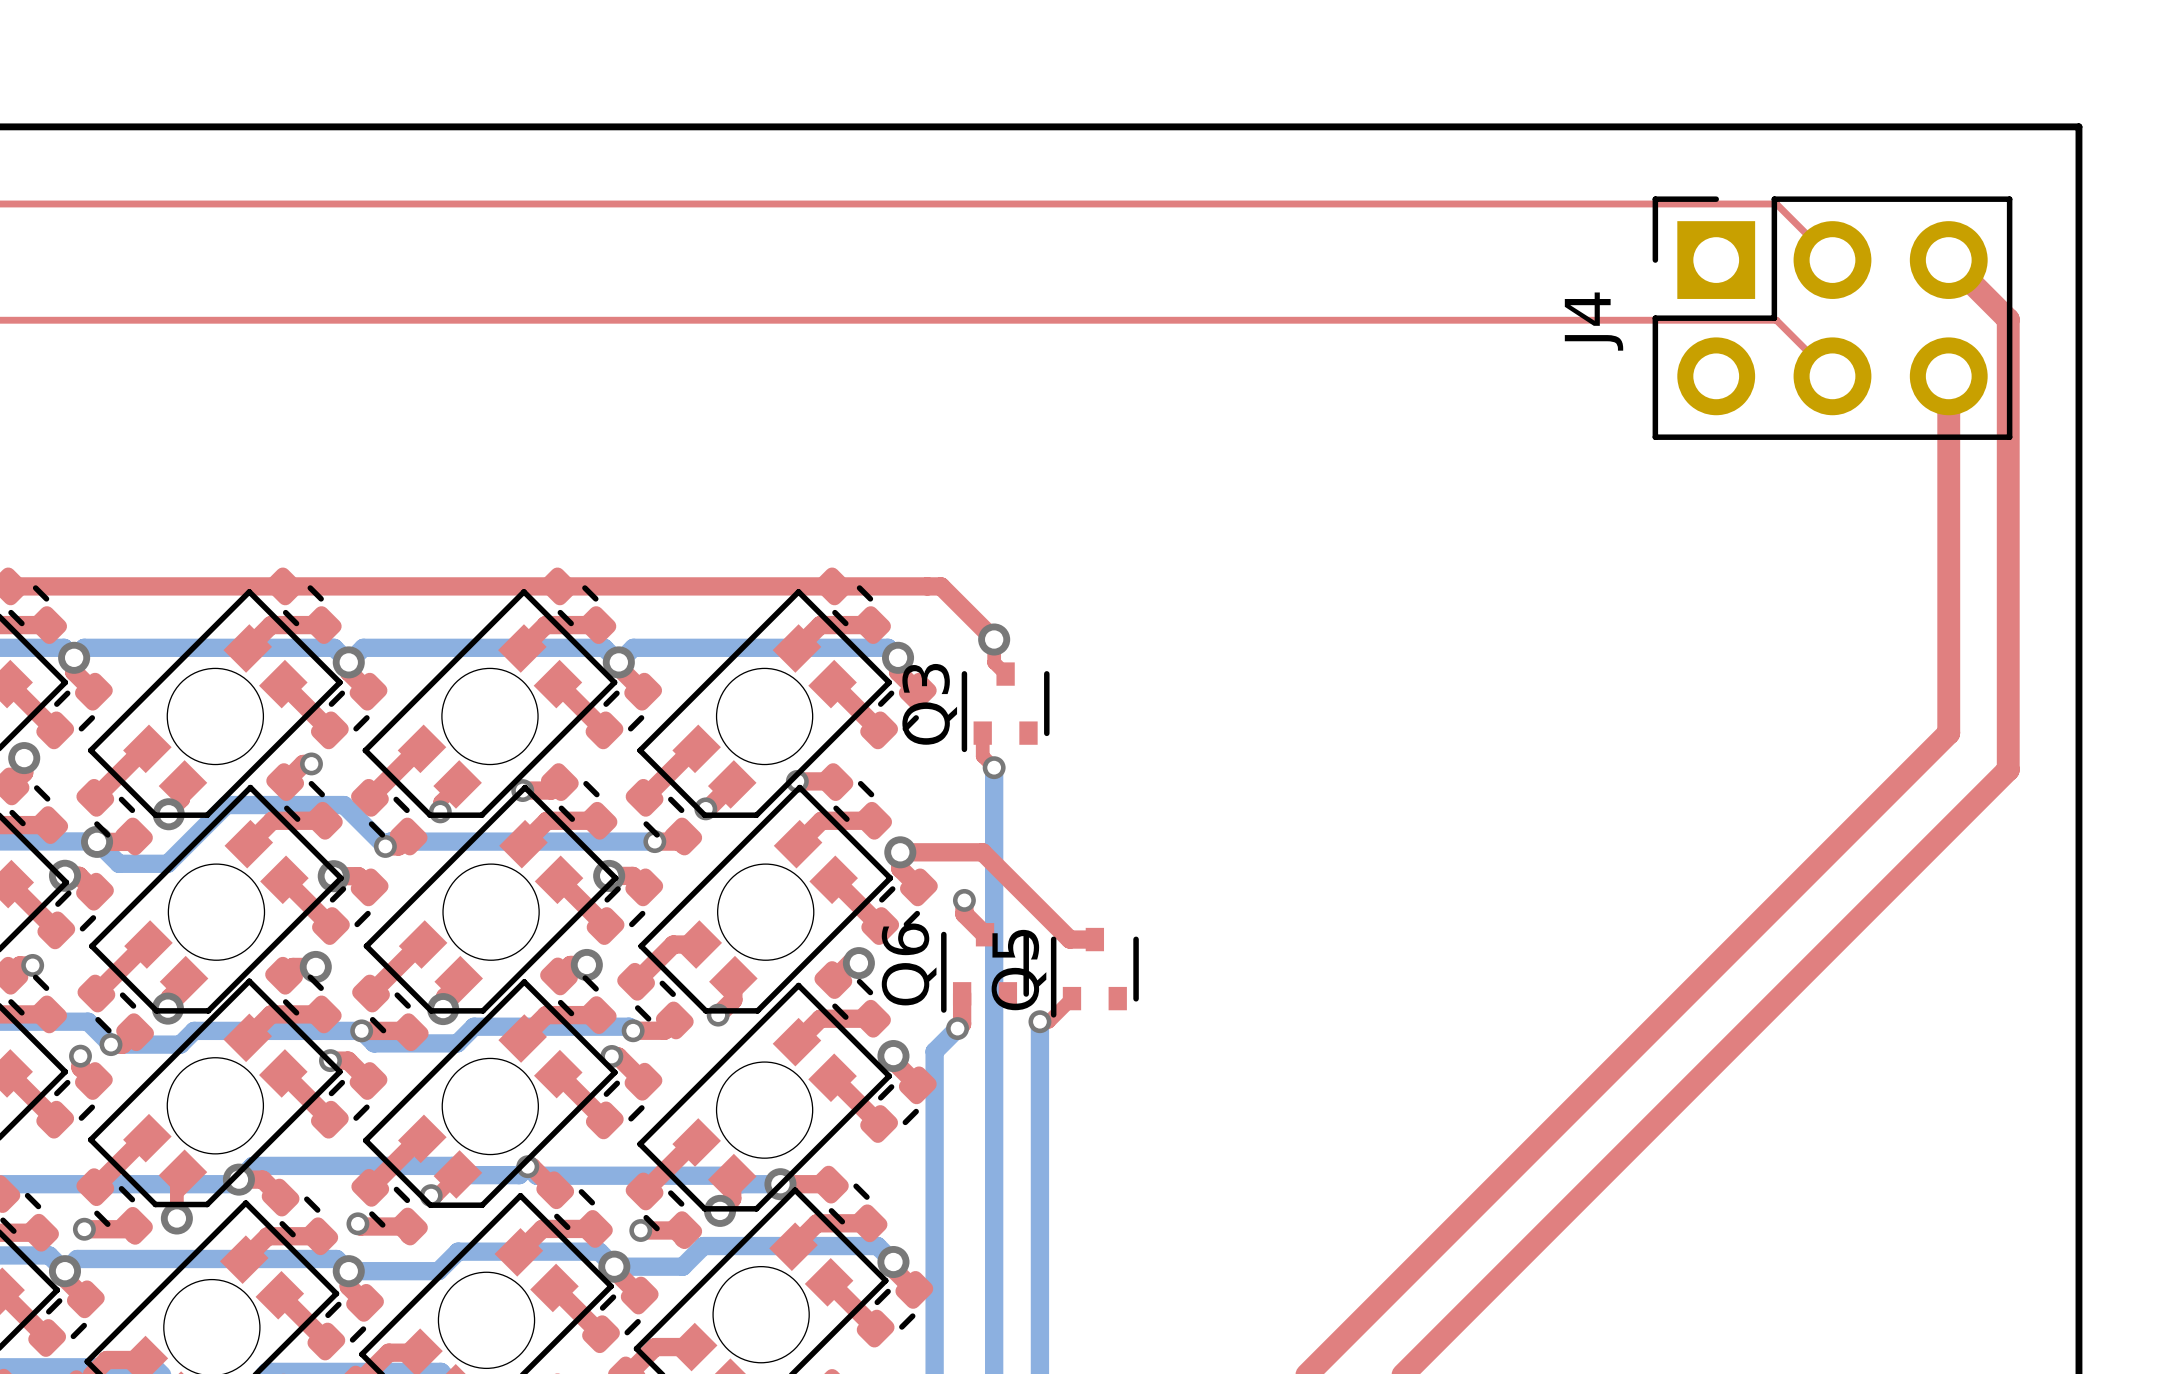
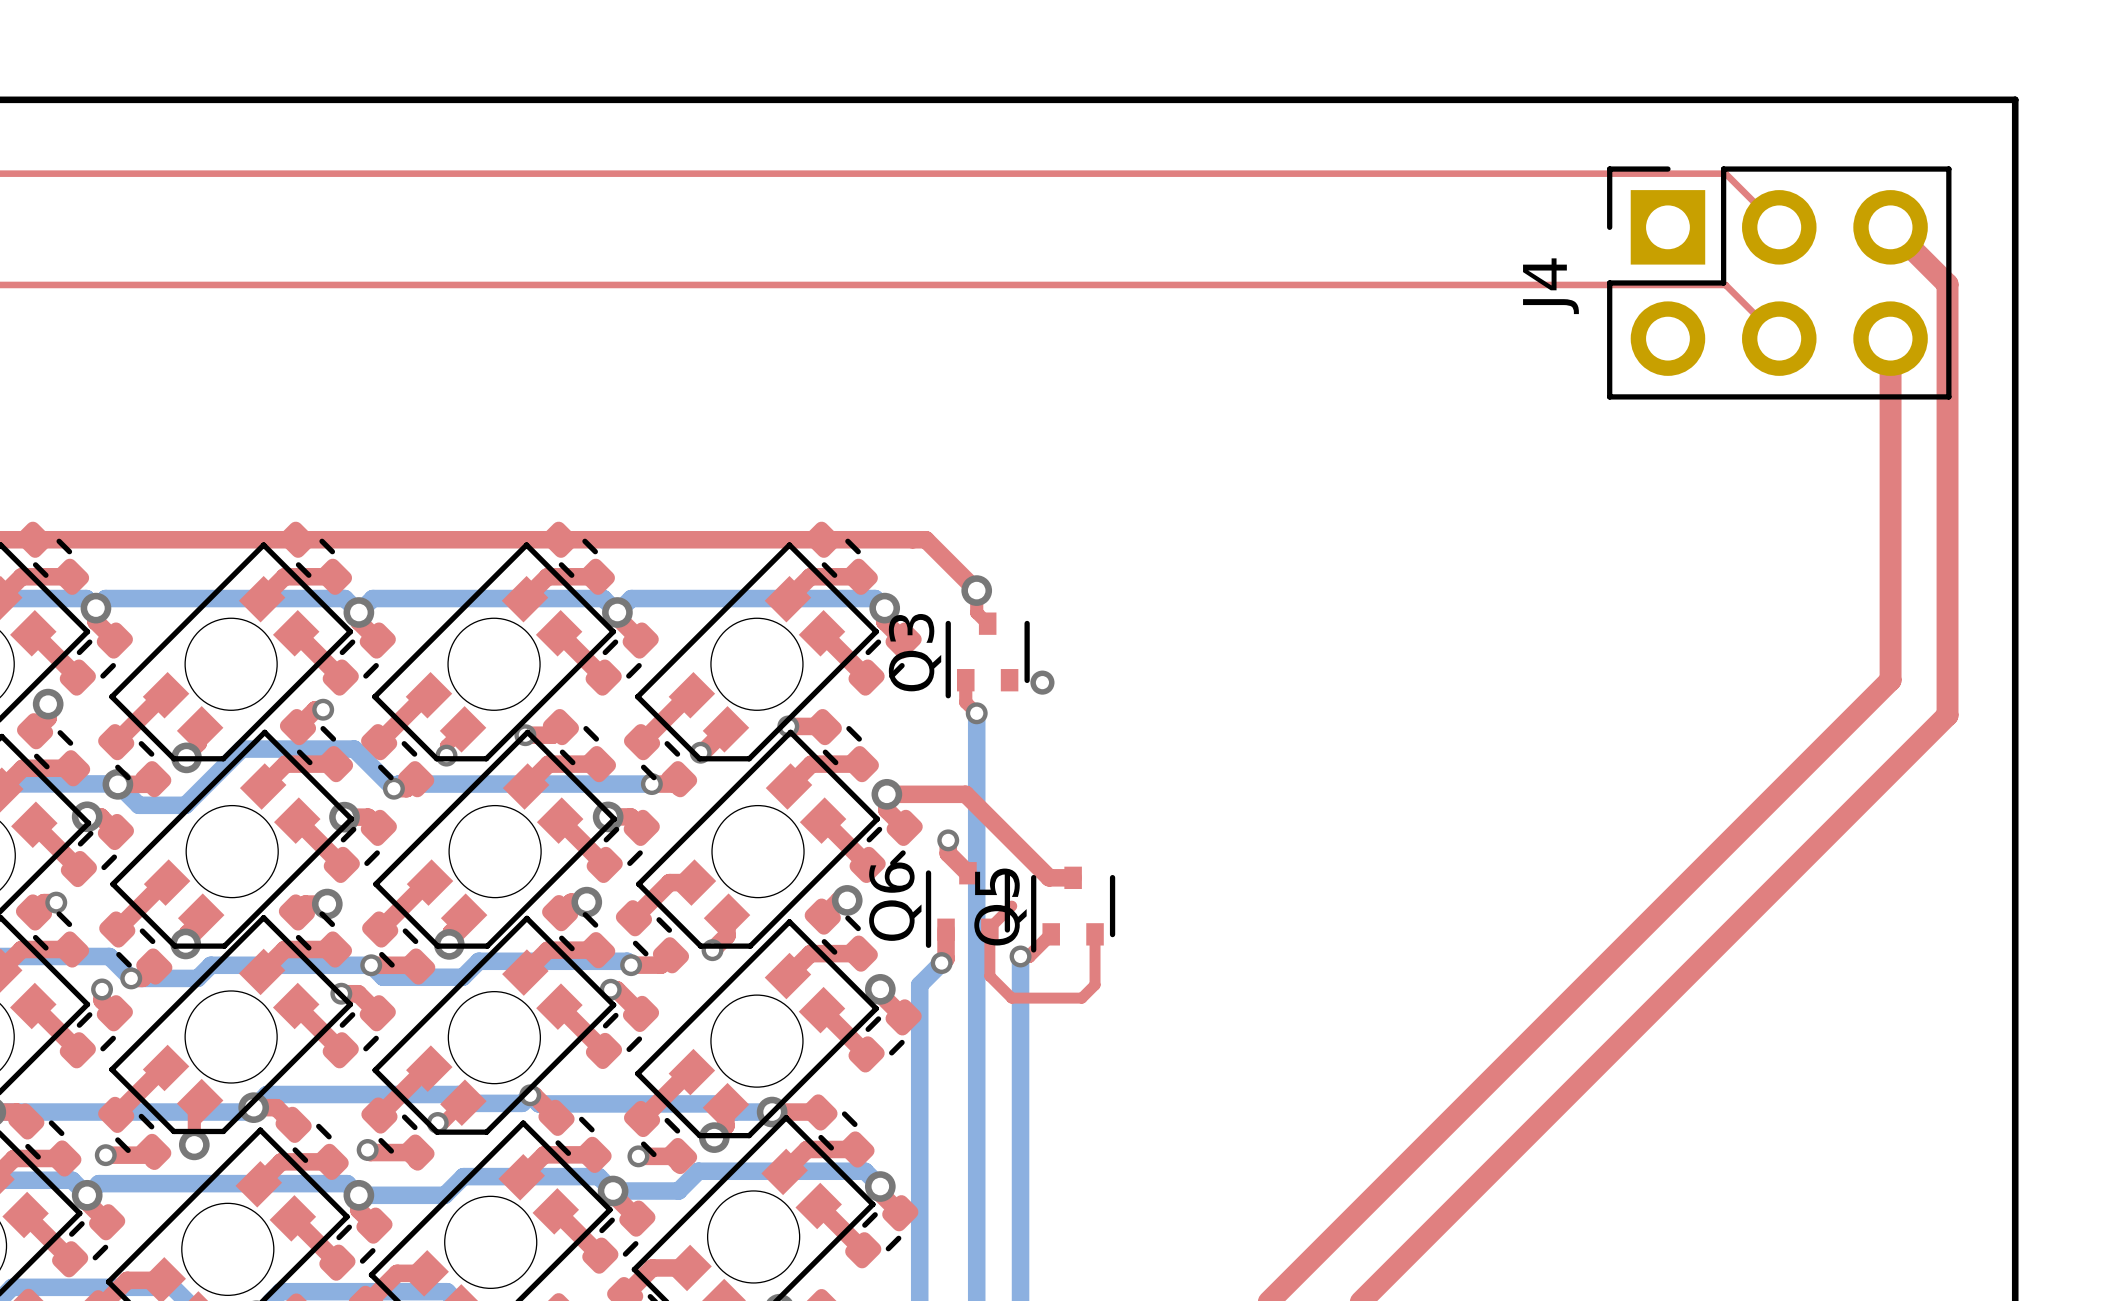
via: none -> (1042, 682)
top track: none -> (1011, 906) (989, 928) (989, 976) (1011, 998) (1081, 998) (1095, 984) (1095, 934)

